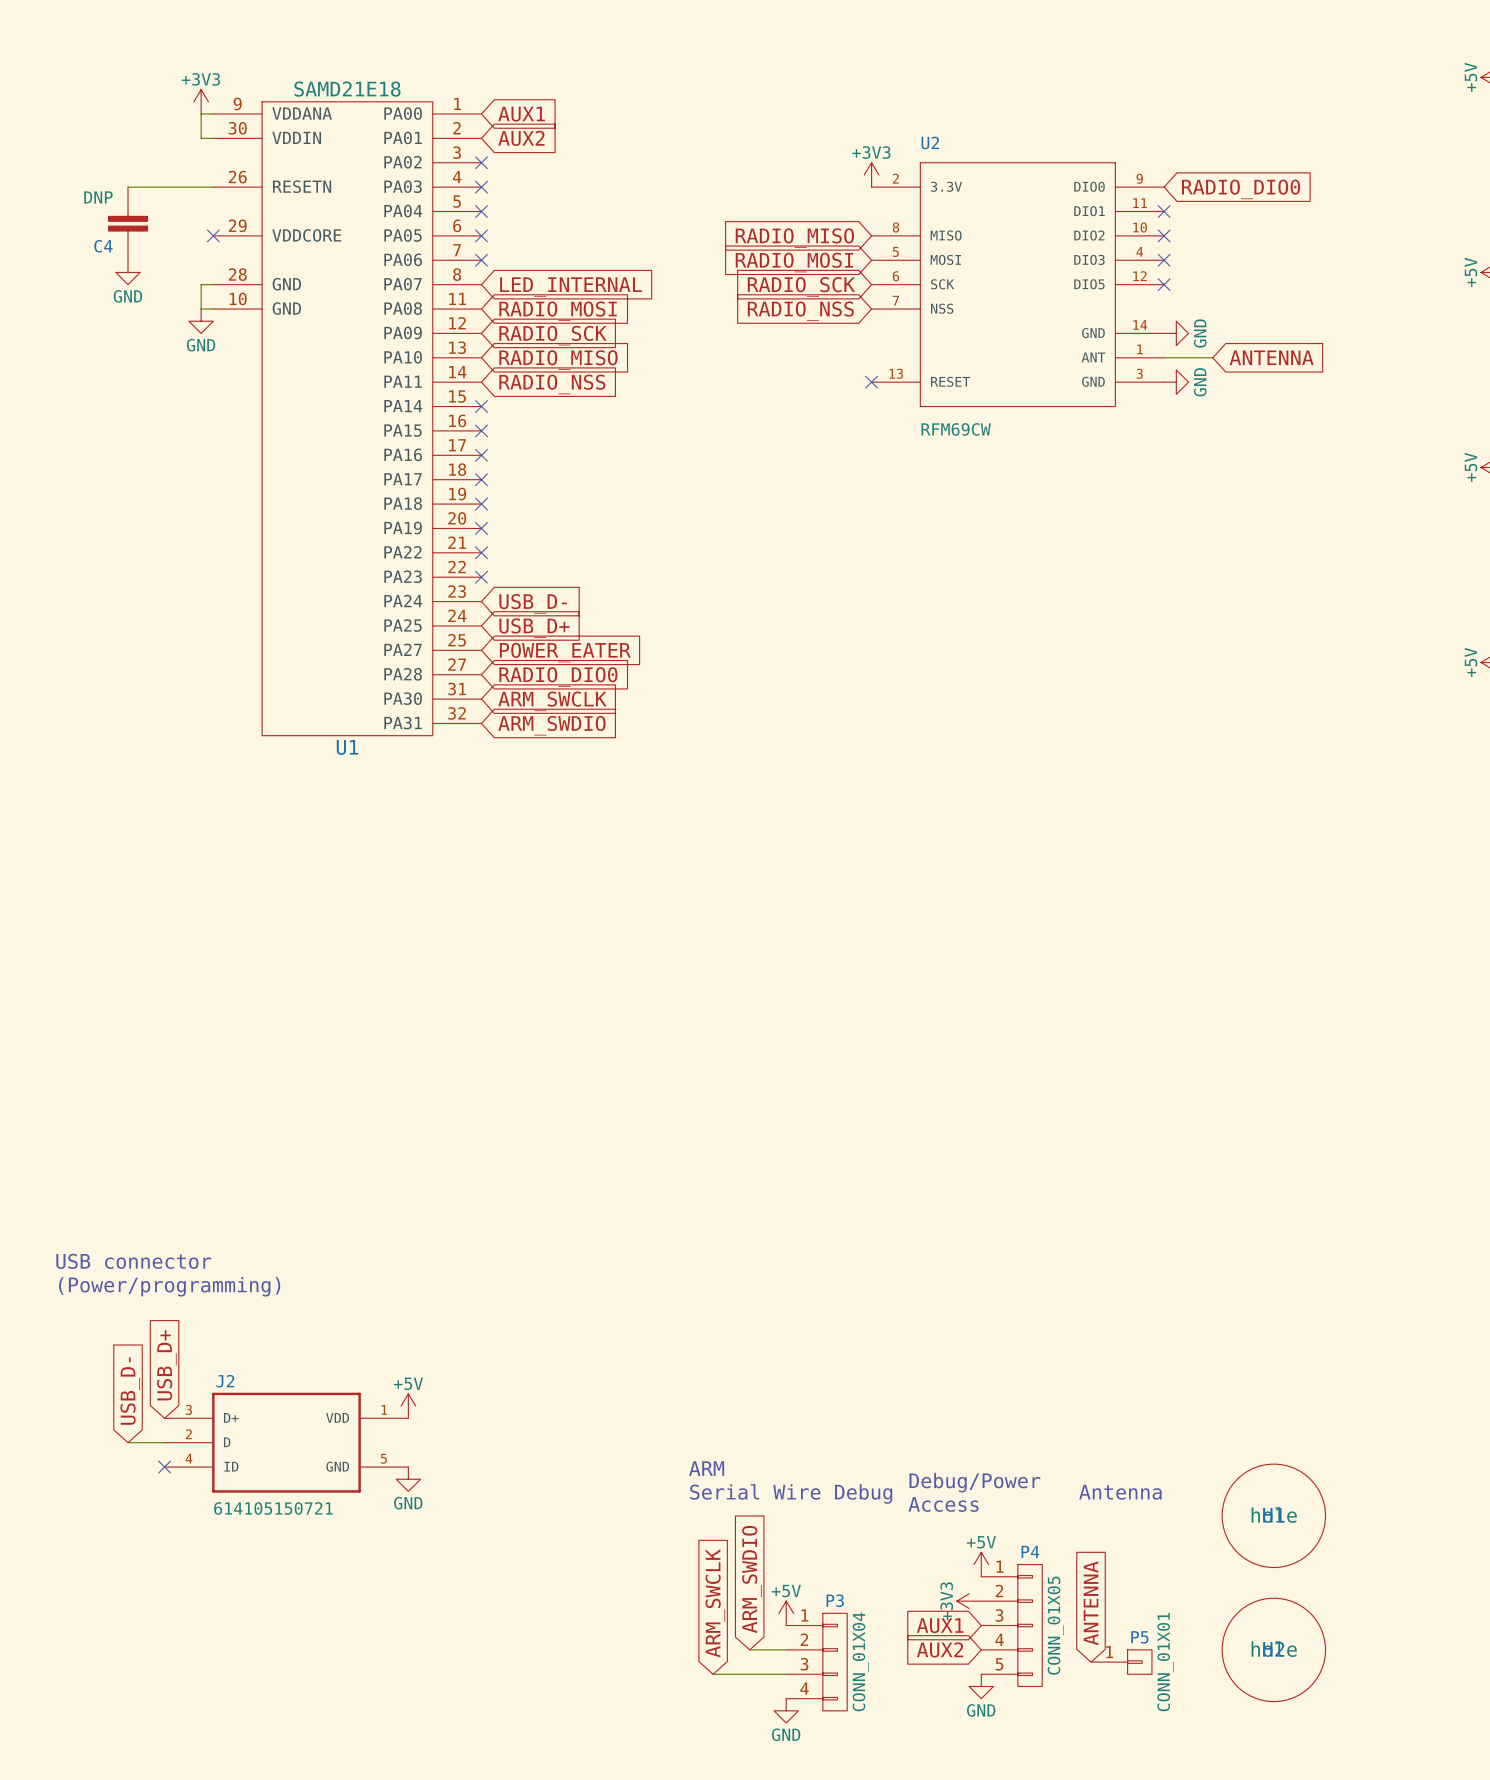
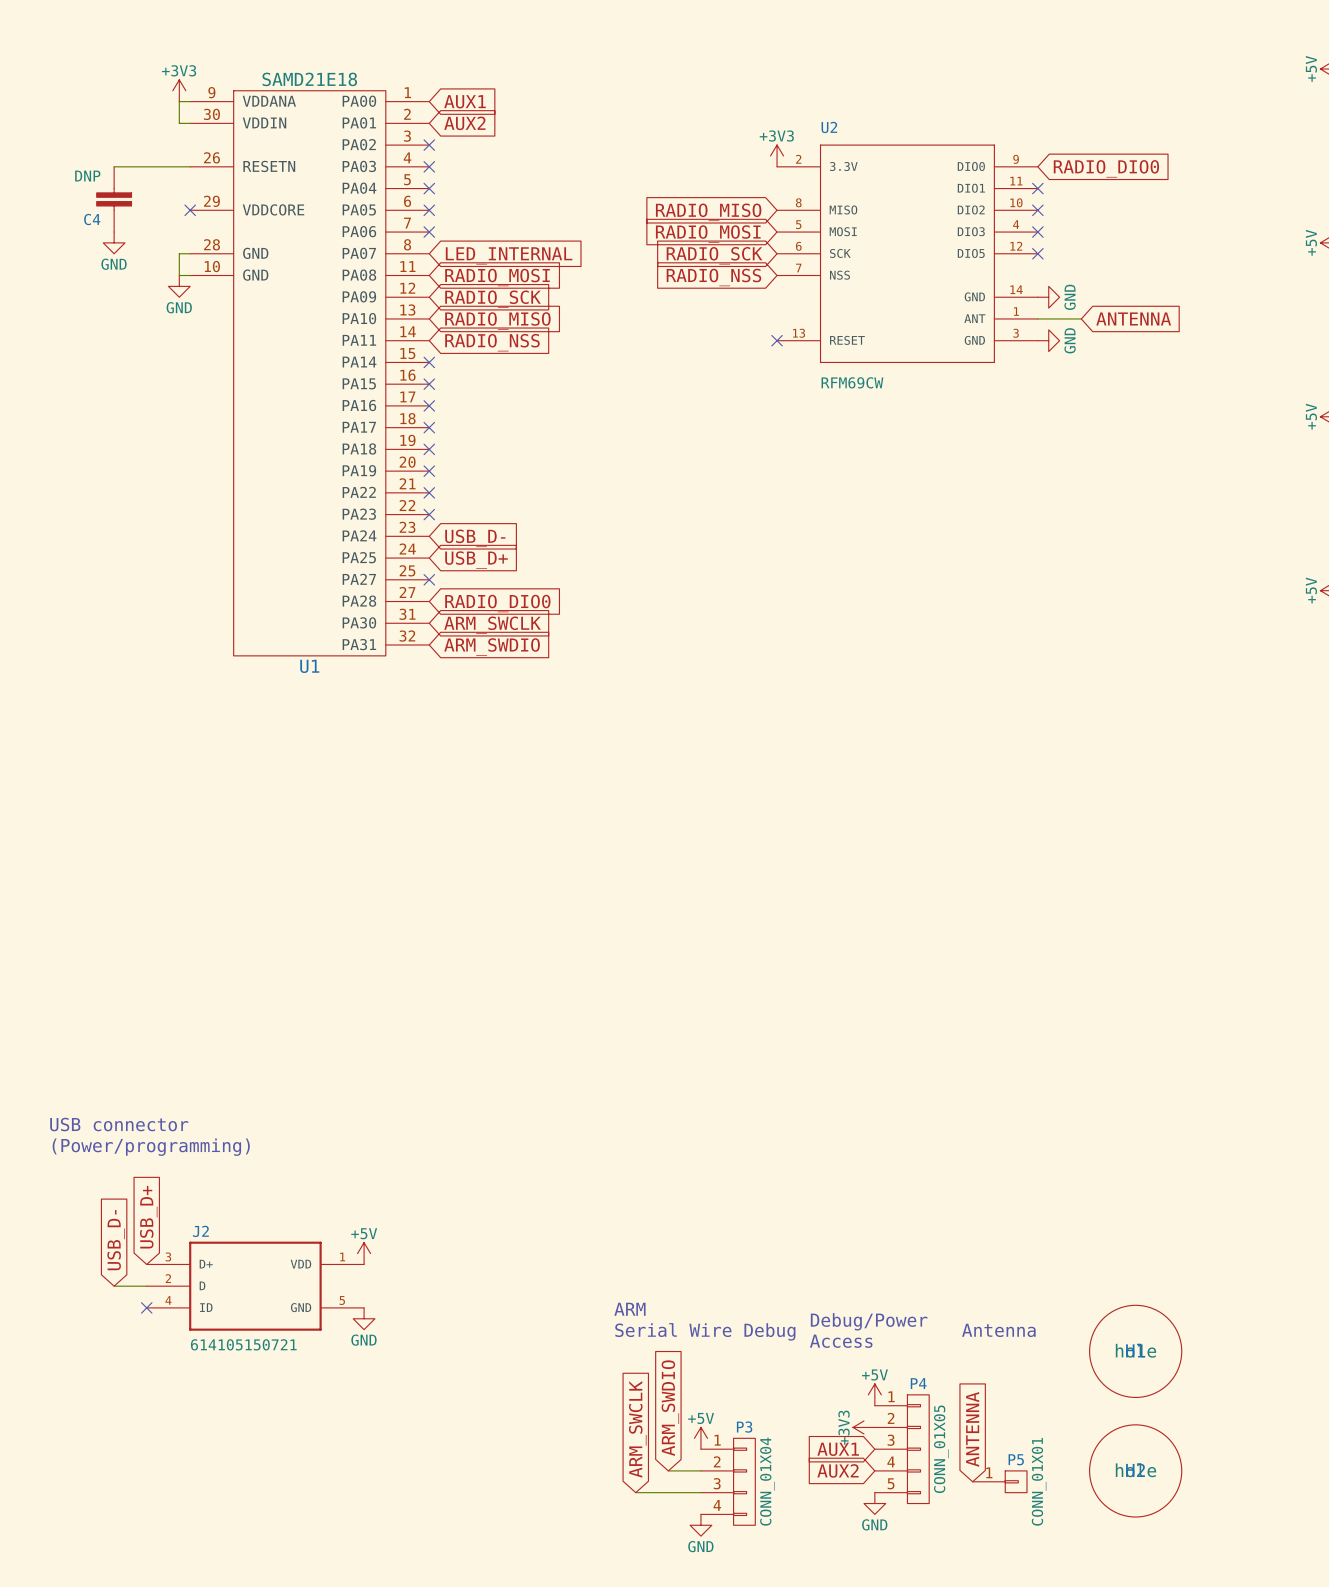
no-connect mark: none -> (429, 579)
global label: POWER_EATER (565, 652) -> none

